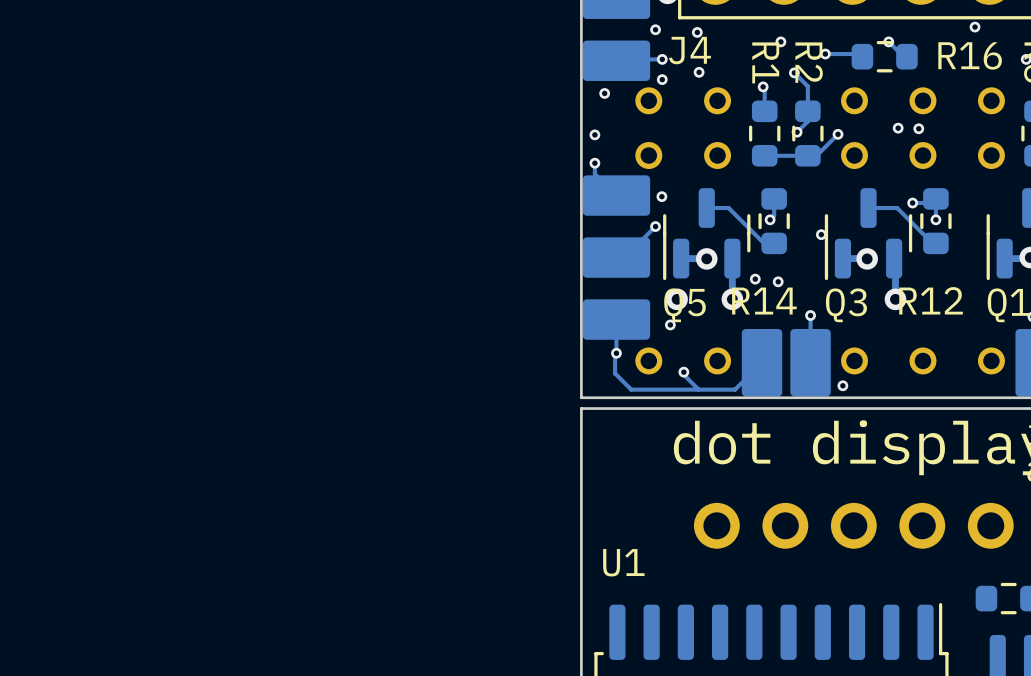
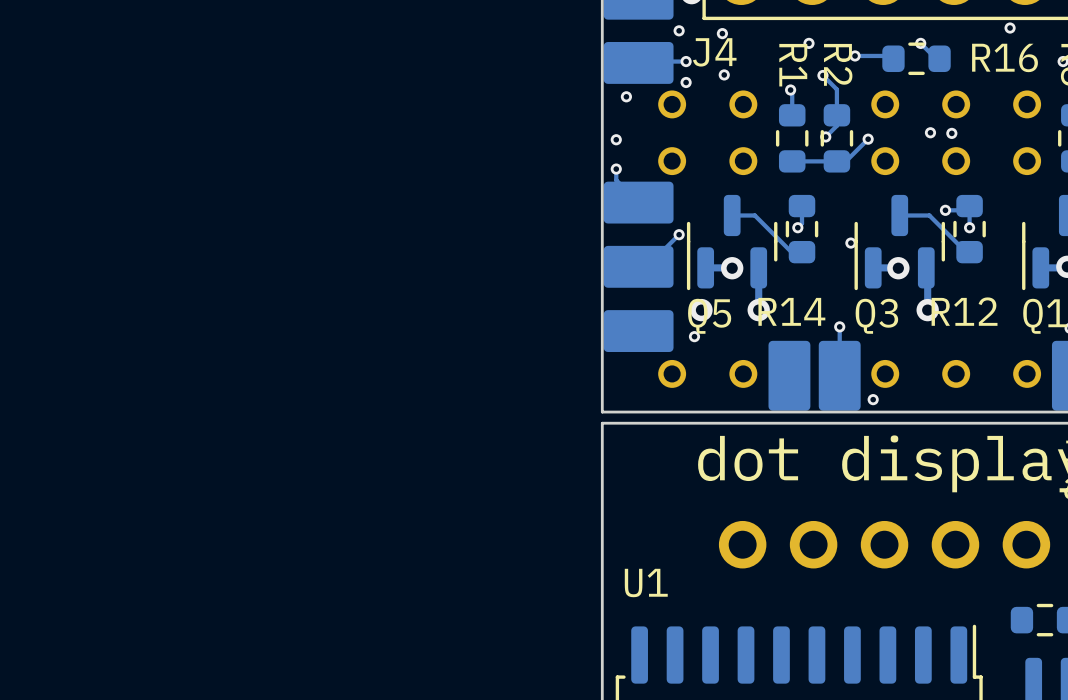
via: (661, 196) -> none
via: (755, 279) -> none
via: (778, 281) -> none
track: (616, 319) (615, 373) (631, 389) (735, 389) (762, 362) -> none
via: (616, 353) -> none
track: (683, 372) (683, 374) (698, 389) -> none
via: (683, 372) -> none

